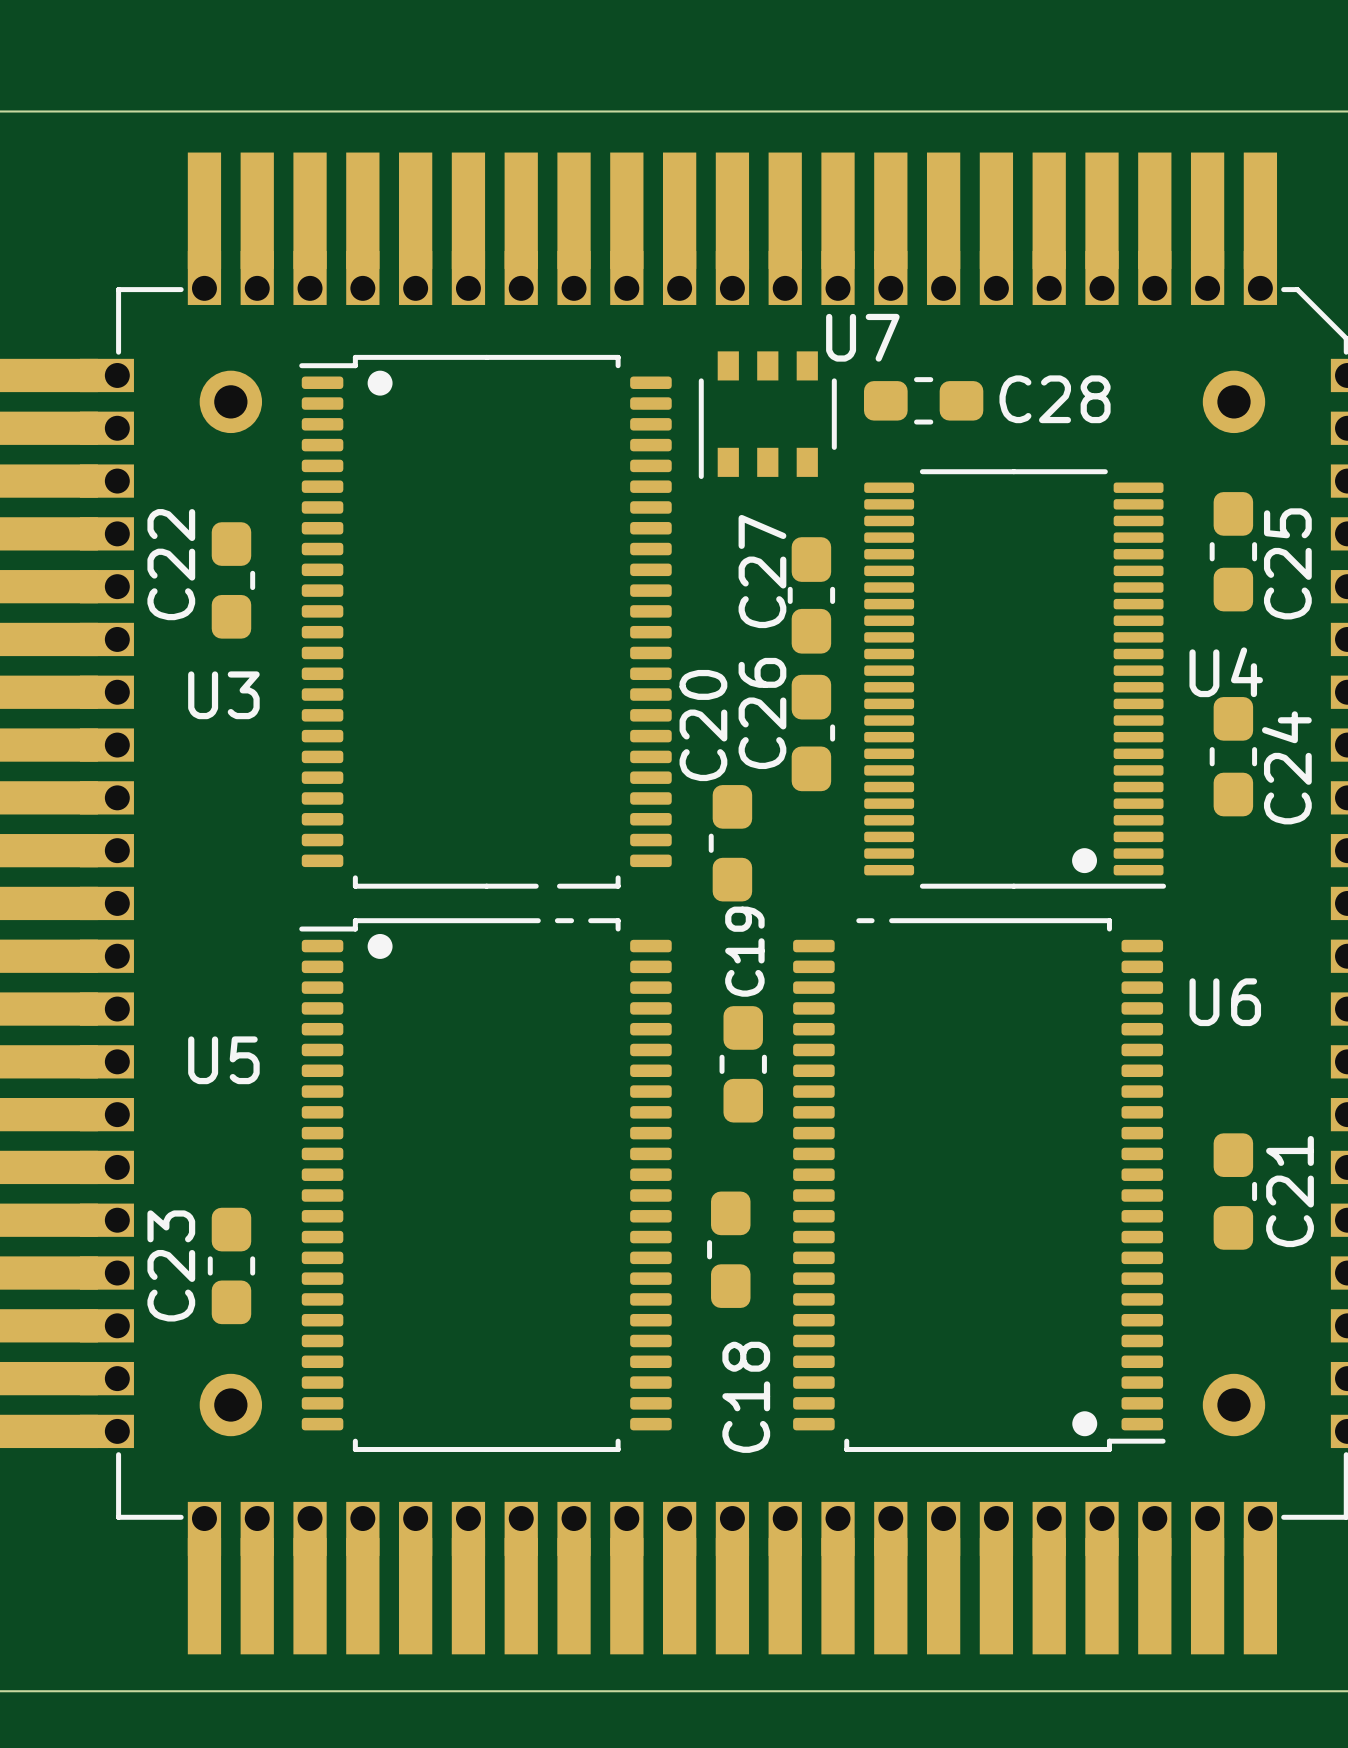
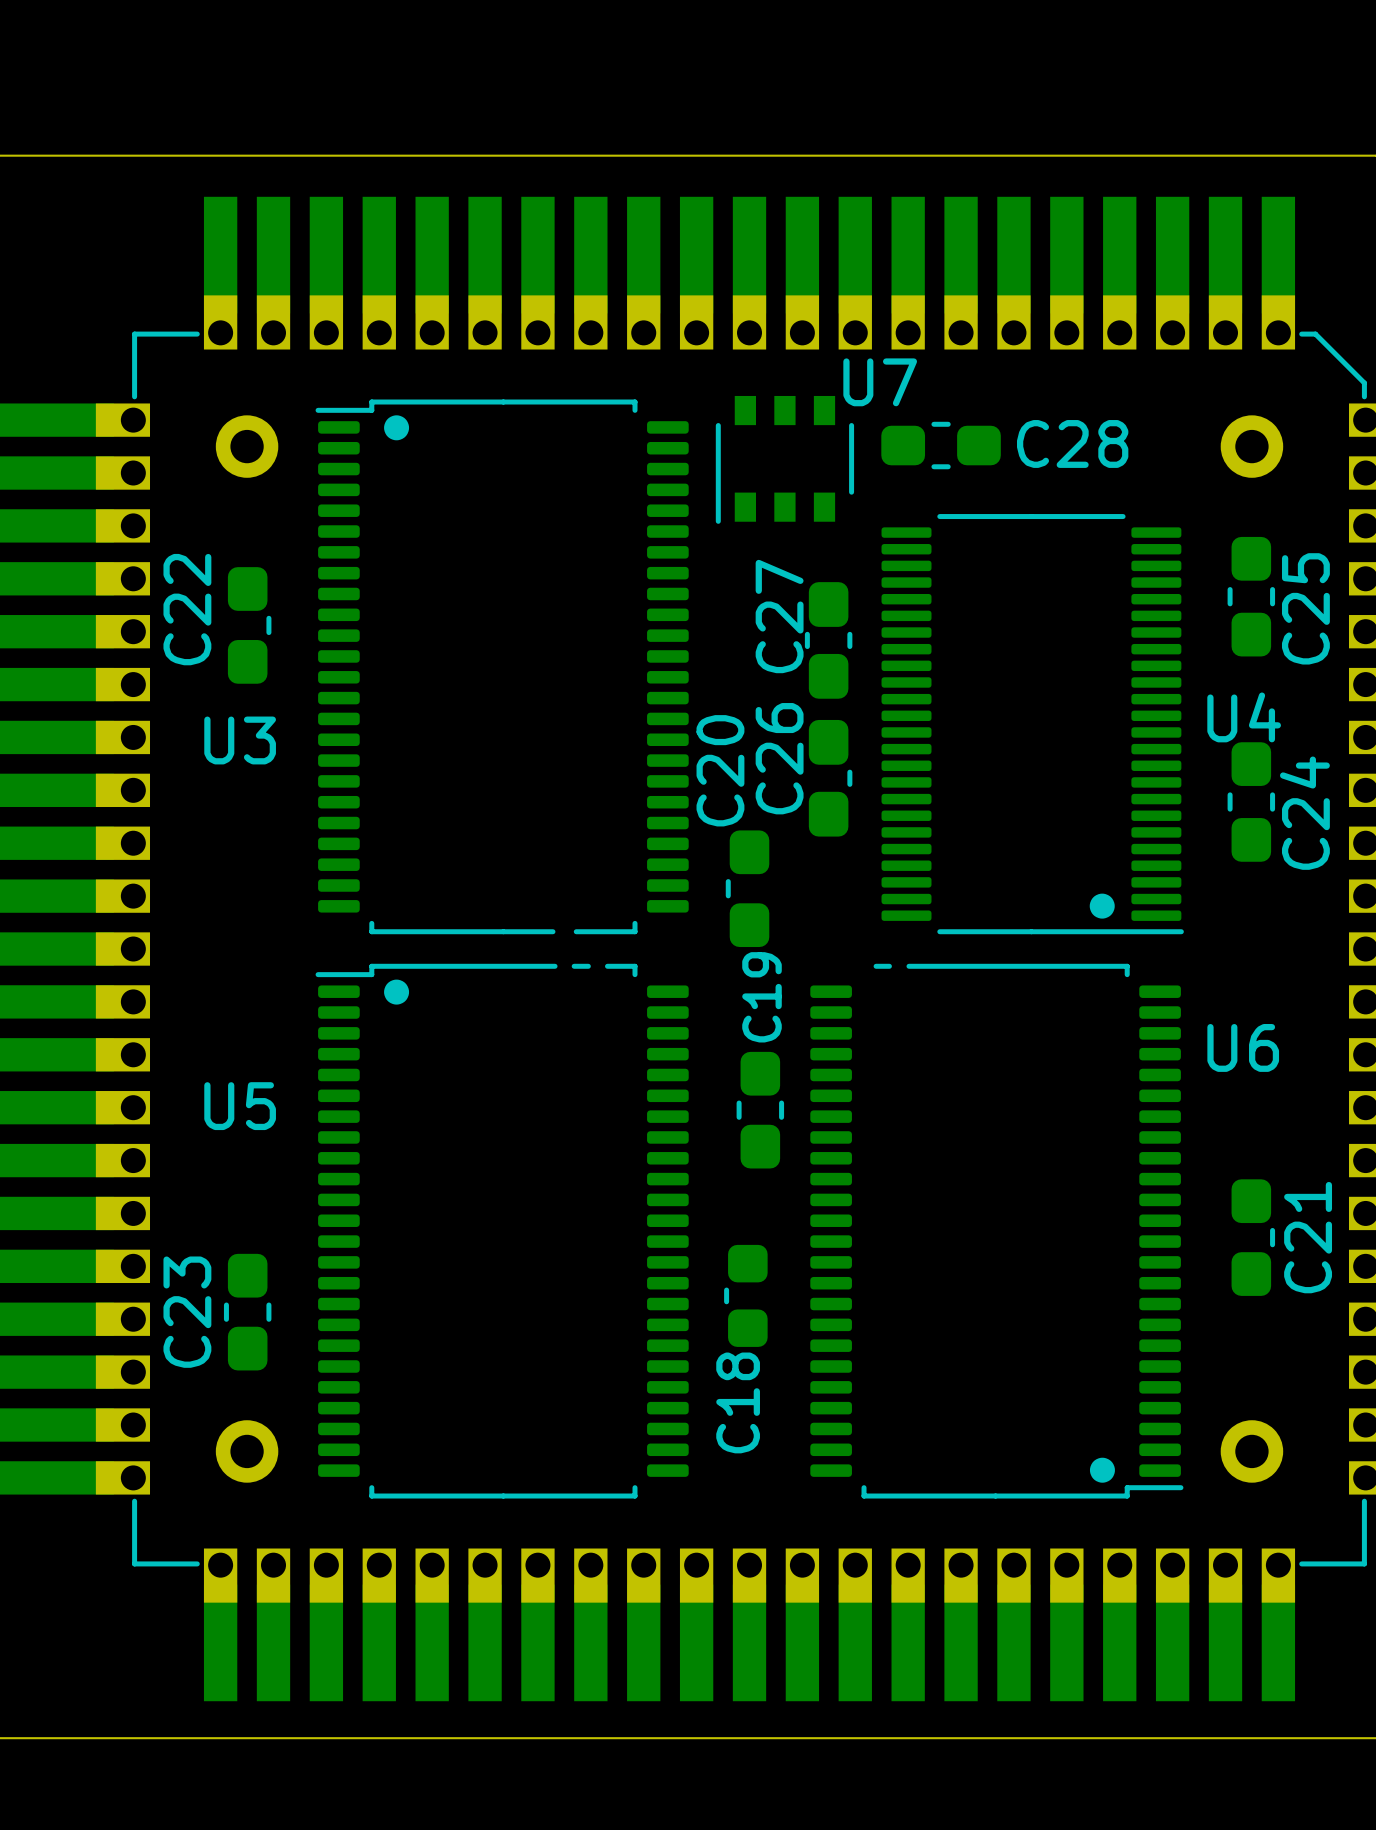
C18 footprint: [707, 1191, 751, 1308] -> [724, 1244, 768, 1347]
C18 name position: C18 (746, 1397) -> C18 (738, 1402)

